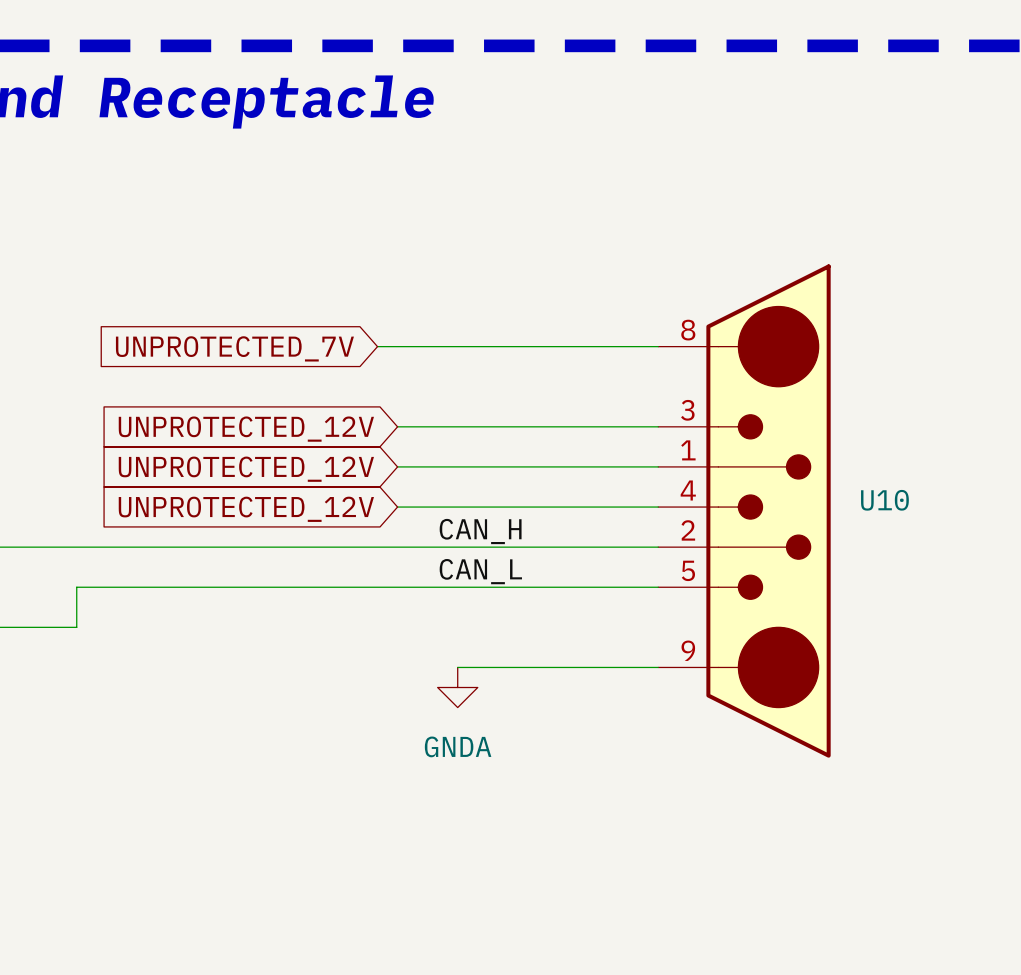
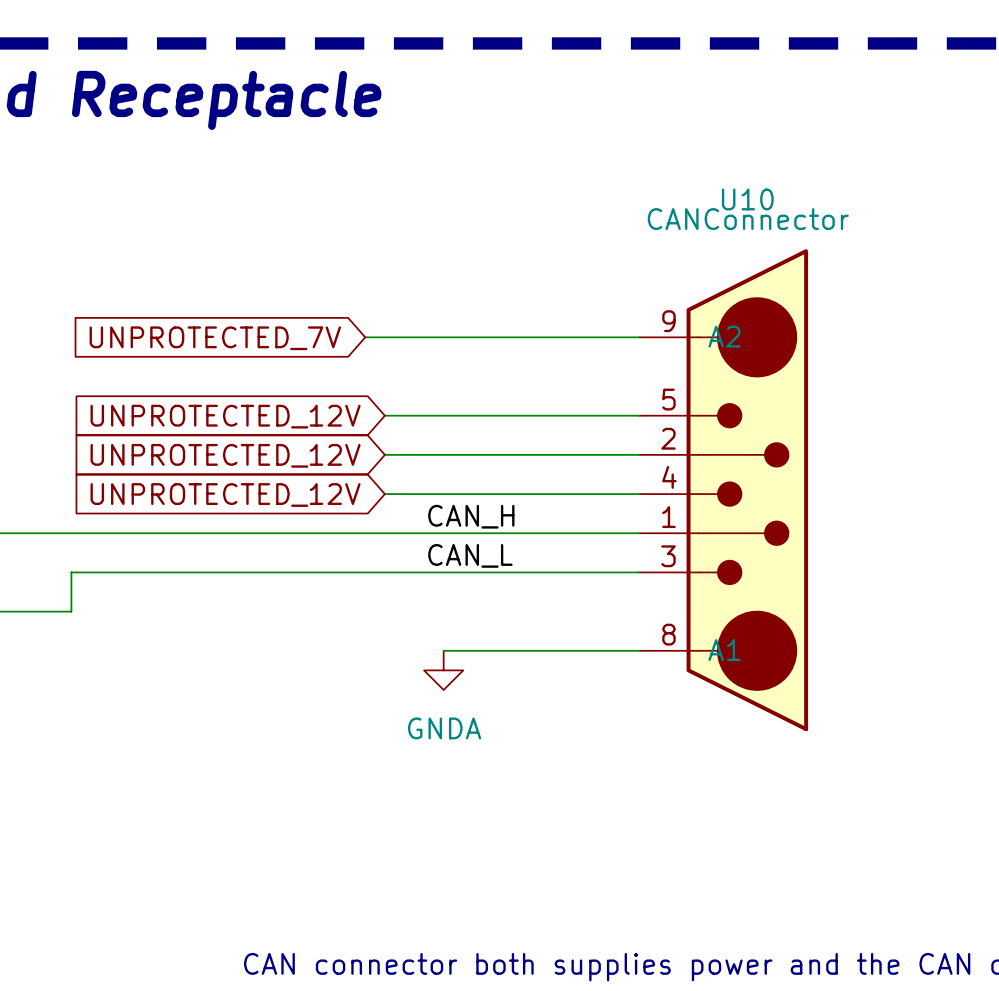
U10 value: none -> CANConnector (748, 219)
U10 symbol: [658, 264, 831, 758] -> [639, 249, 809, 732]
U10 name position: U10 (884, 500) -> U10 (747, 199)

